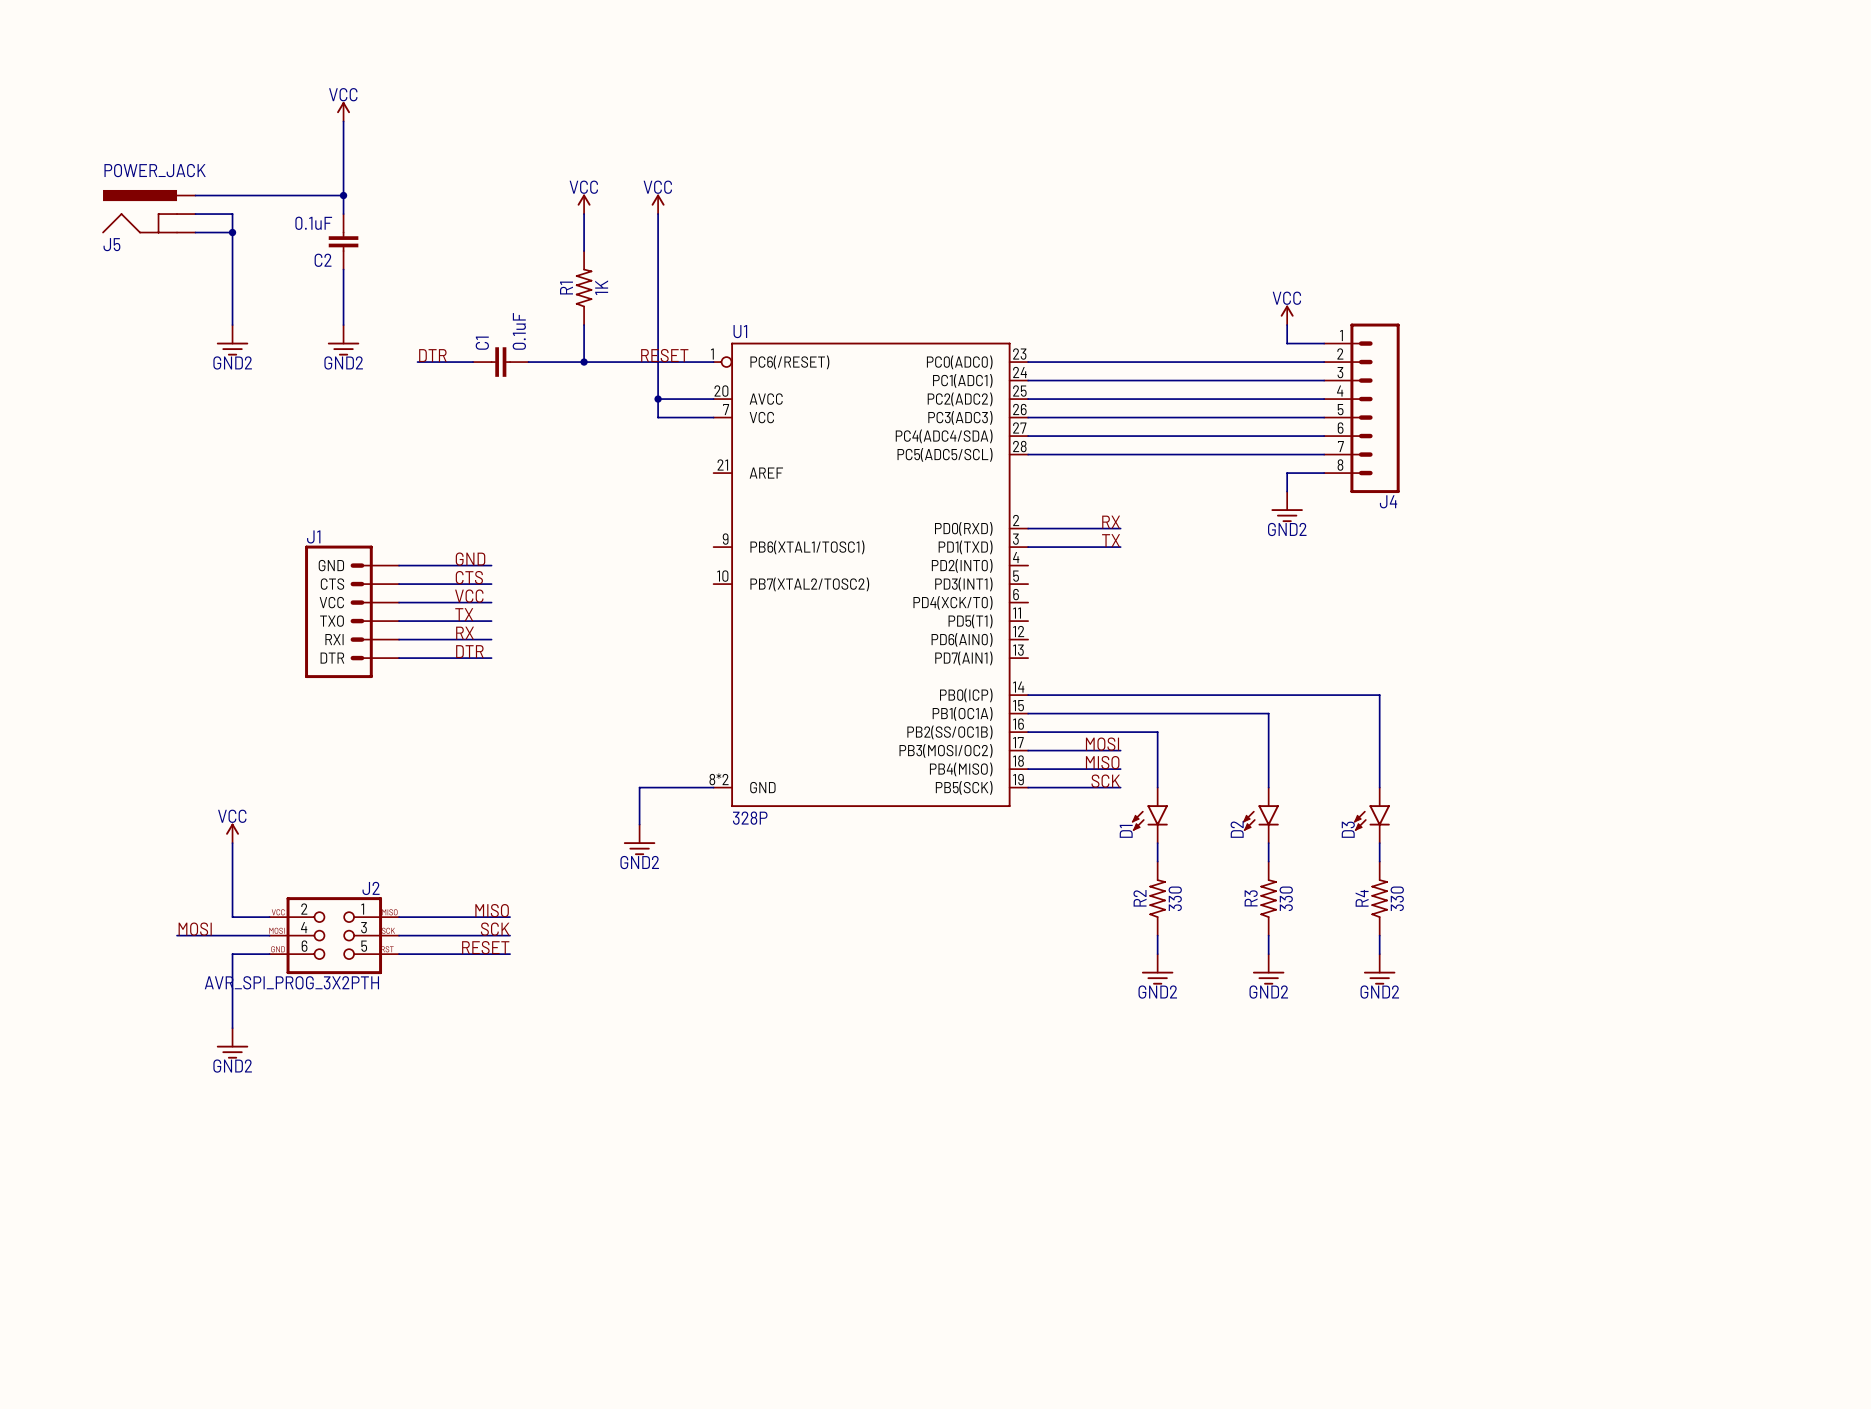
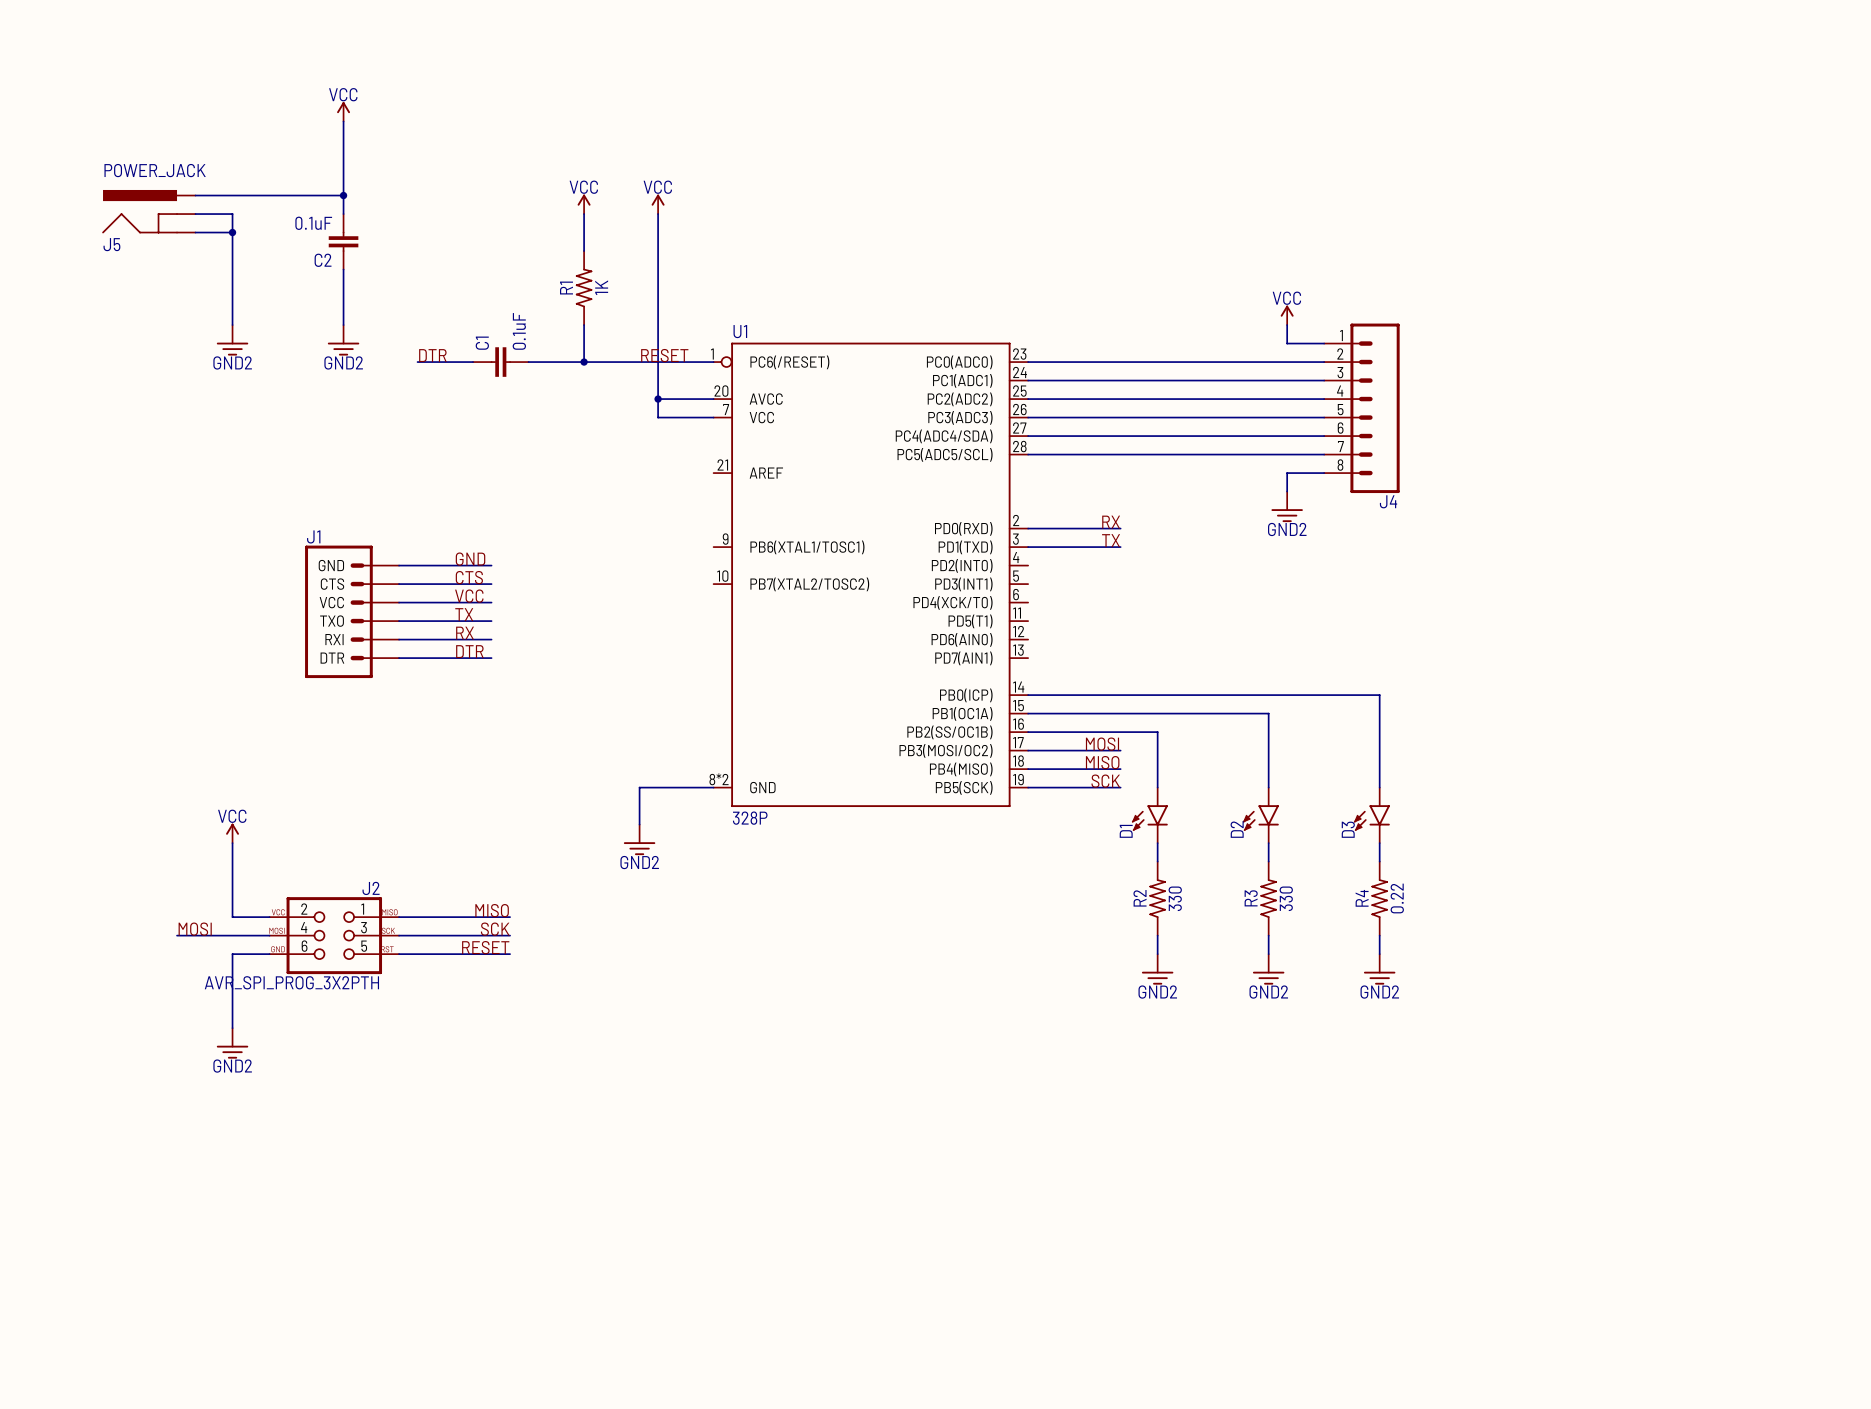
R4 value: 330 (1397, 898) -> 0.22 (1397, 898)

